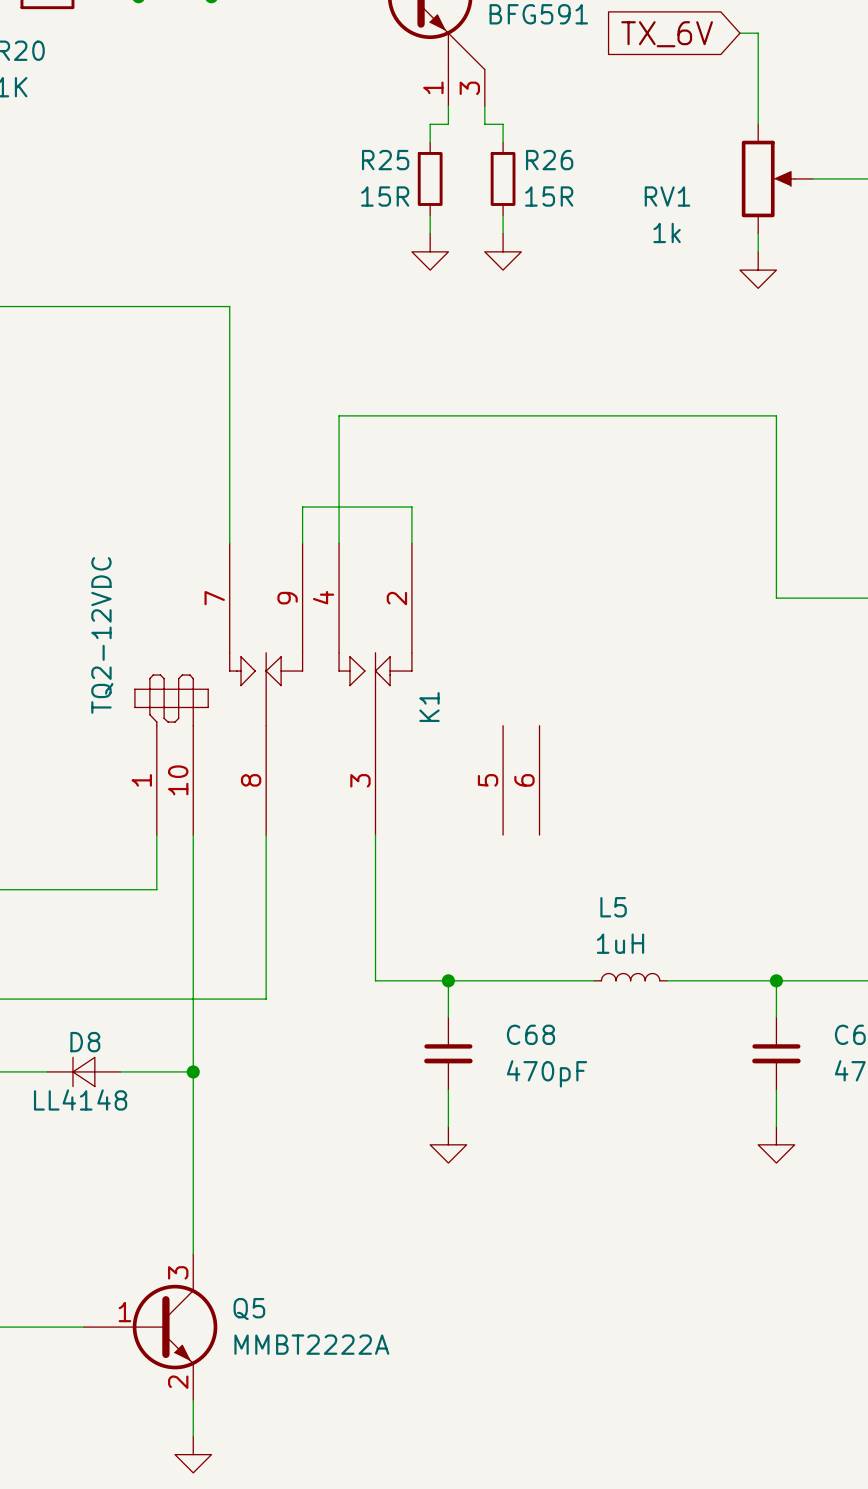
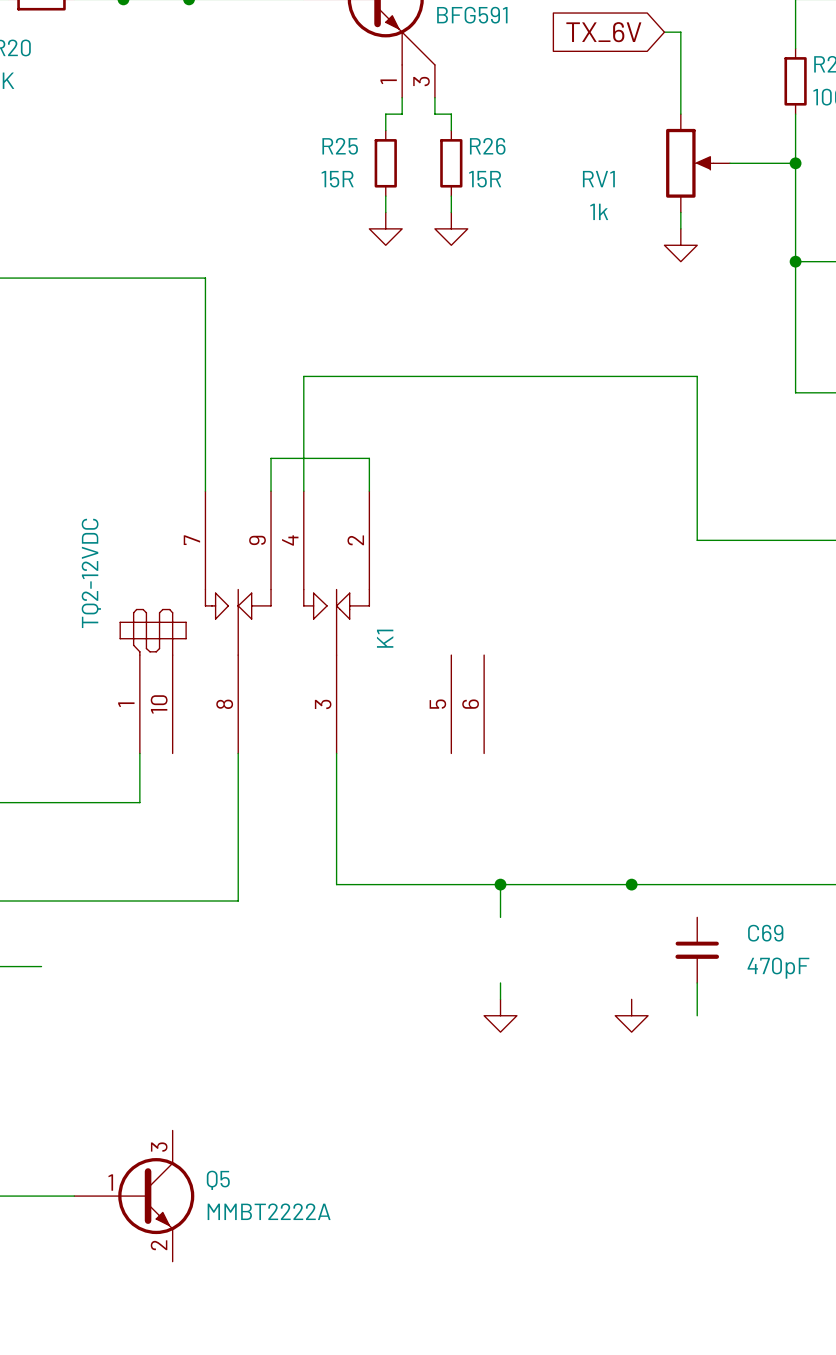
wire: (193, 835) (193, 1254) -> none
L5: 1uH (630, 977) -> none
wire: (448, 980) (448, 1017) -> (500, 884) (500, 917)
junction: (448, 980) -> none
junction: none -> (500, 884)
wire: none -> (533, 884) (598, 884)
wire: (776, 980) (776, 1017) -> none
junction position: (776, 980) -> (631, 884)
C68: 470pF (448, 1053) -> none
D8: LL4148 (83, 1071) -> none
wire: (120, 1071) (193, 1071) -> none
junction: (193, 1071) -> none
wire: (448, 1090) (448, 1126) -> none
wire: none -> (500, 982) (500, 999)
power symbol: none -> (500, 1015)
power symbol: (448, 1144) -> none
power symbol position: (776, 1144) -> (631, 1015)
wire: (193, 1399) (193, 1436) -> none
power symbol: (193, 1454) -> none

